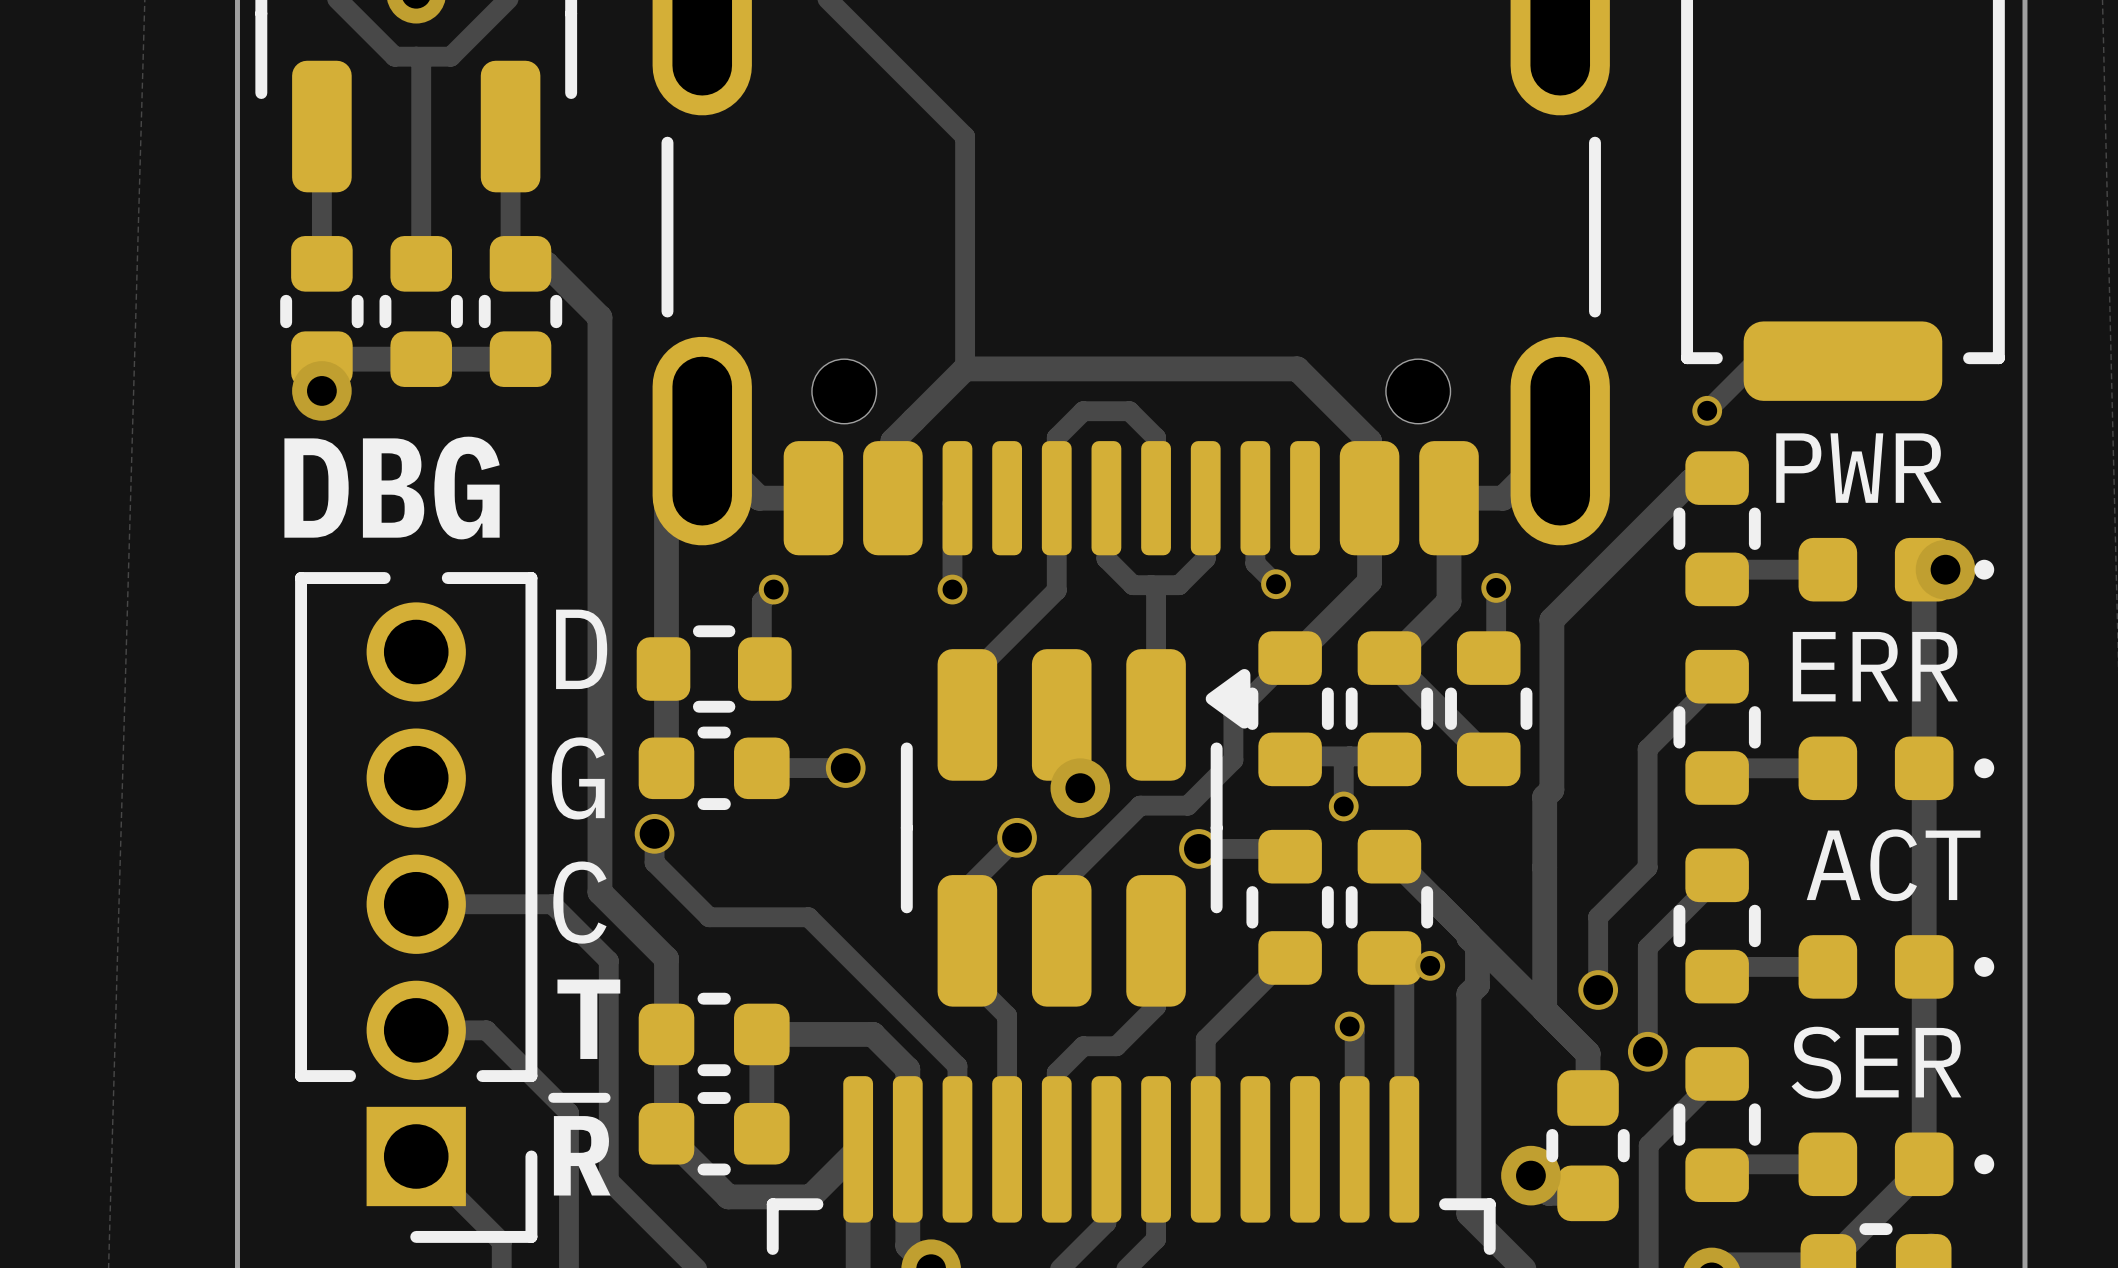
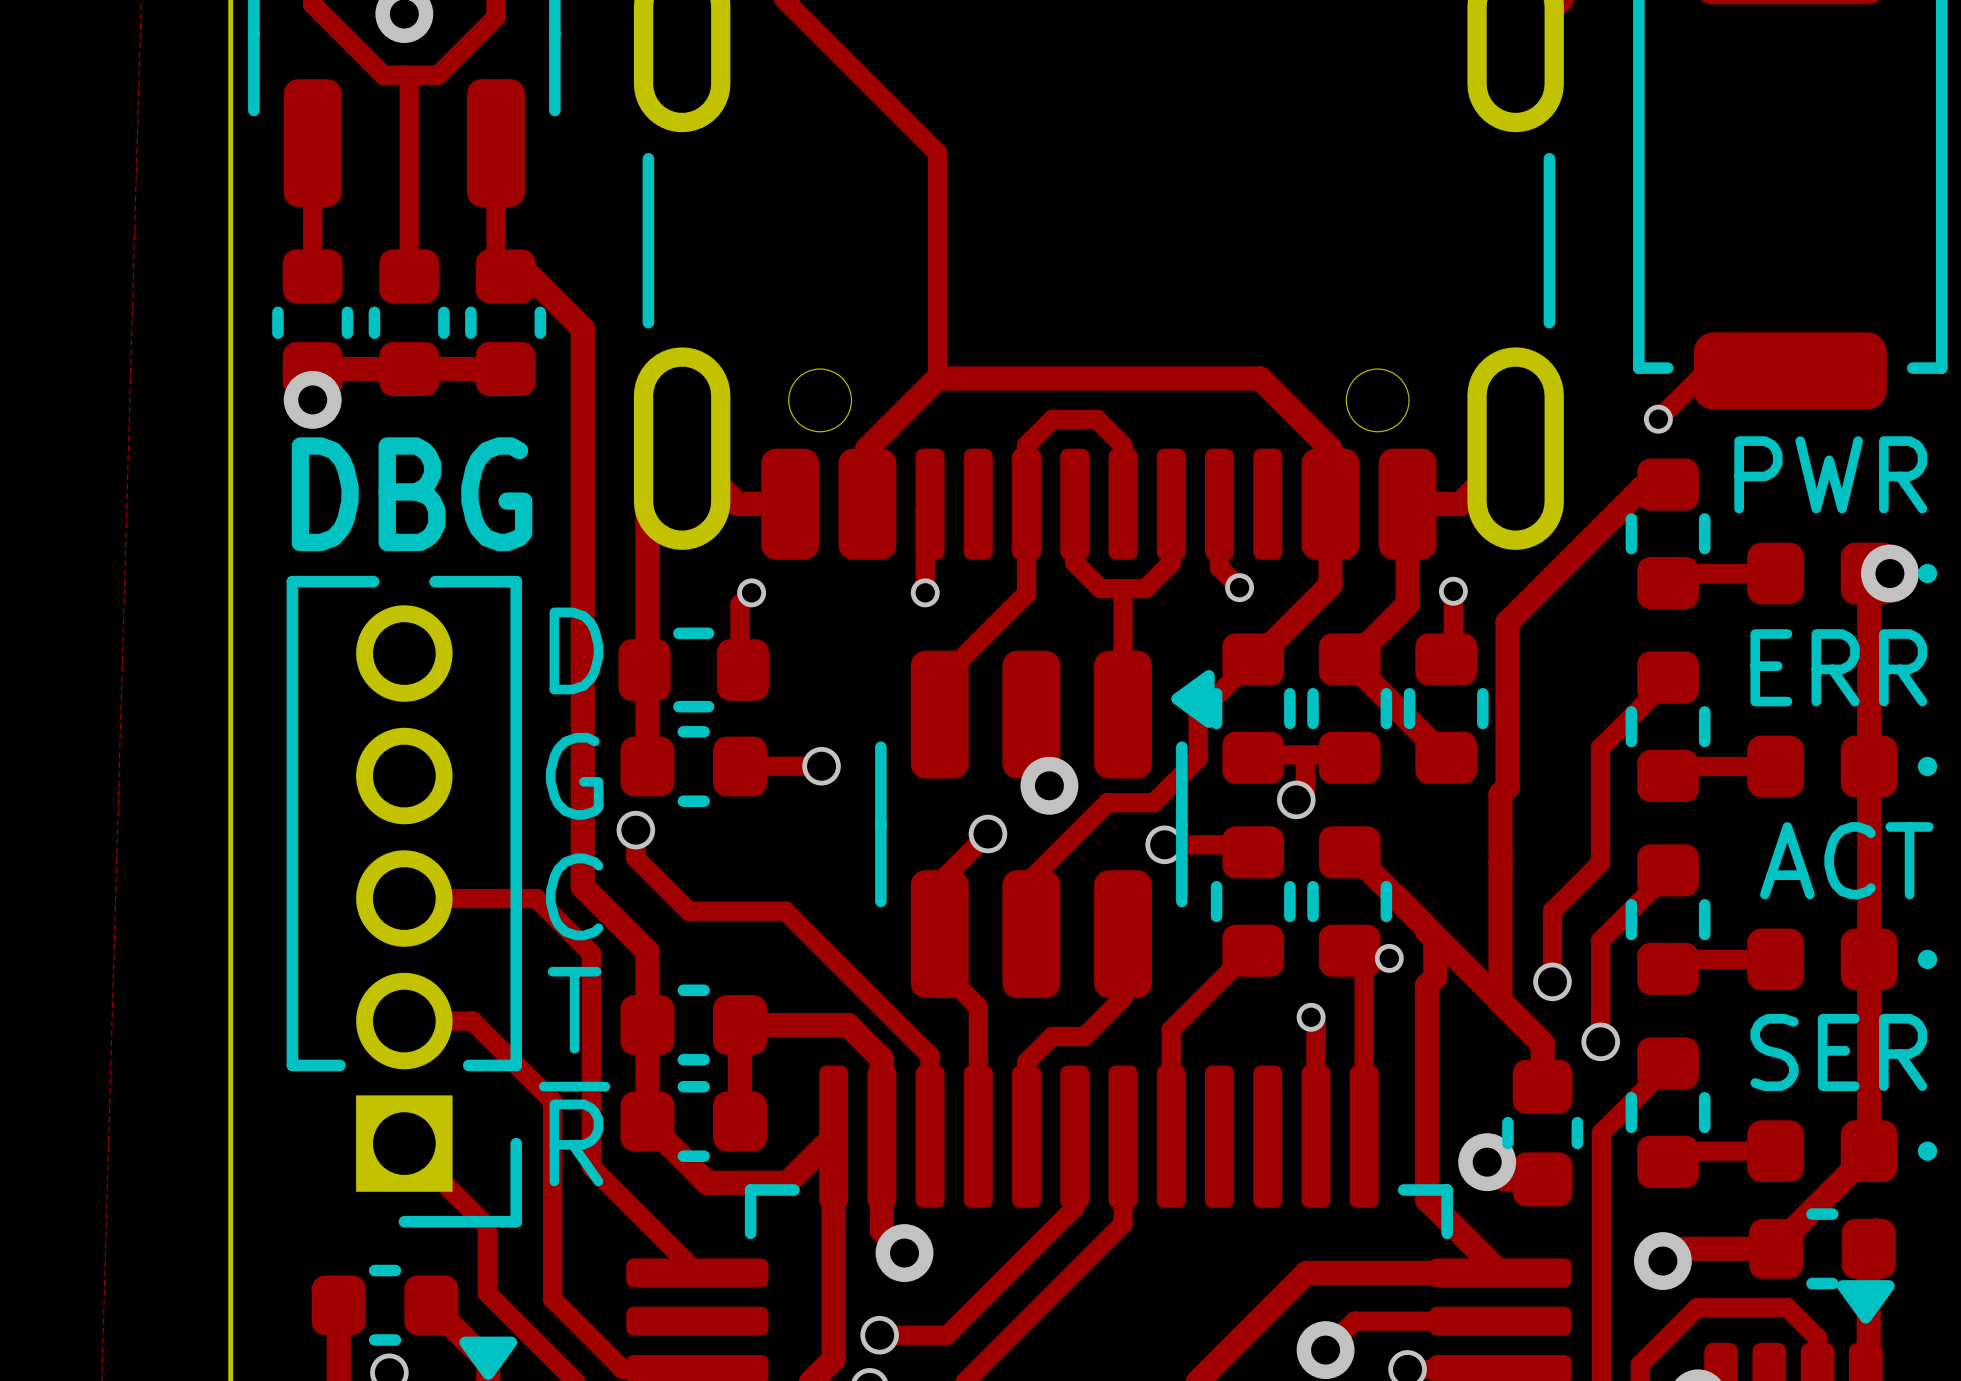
via size: [1328, 791, 1359, 822] -> [1277, 780, 1316, 820]

